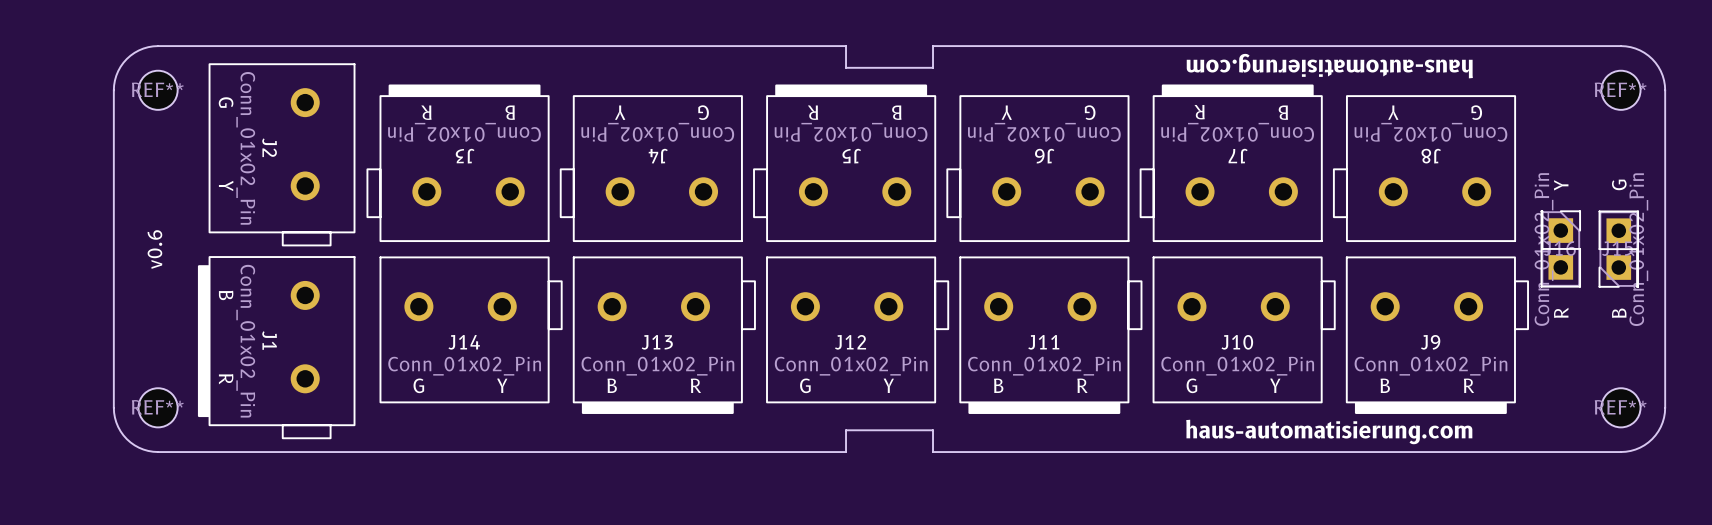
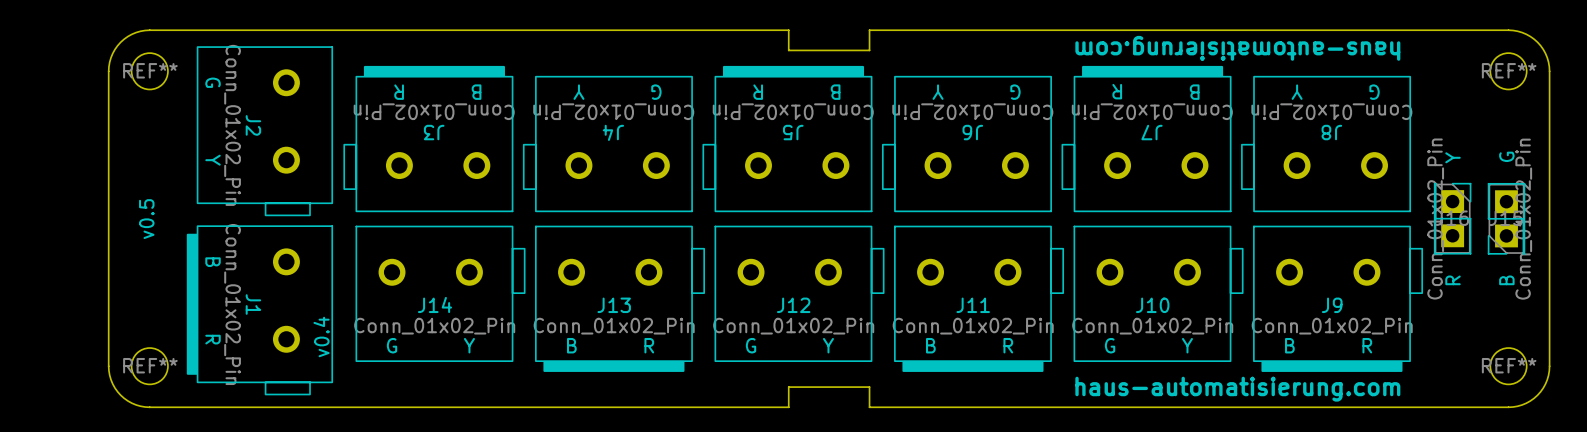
text: v0.6 (154, 249) -> v0.5 (146, 219)
text: none -> v0.4 (321, 336)

